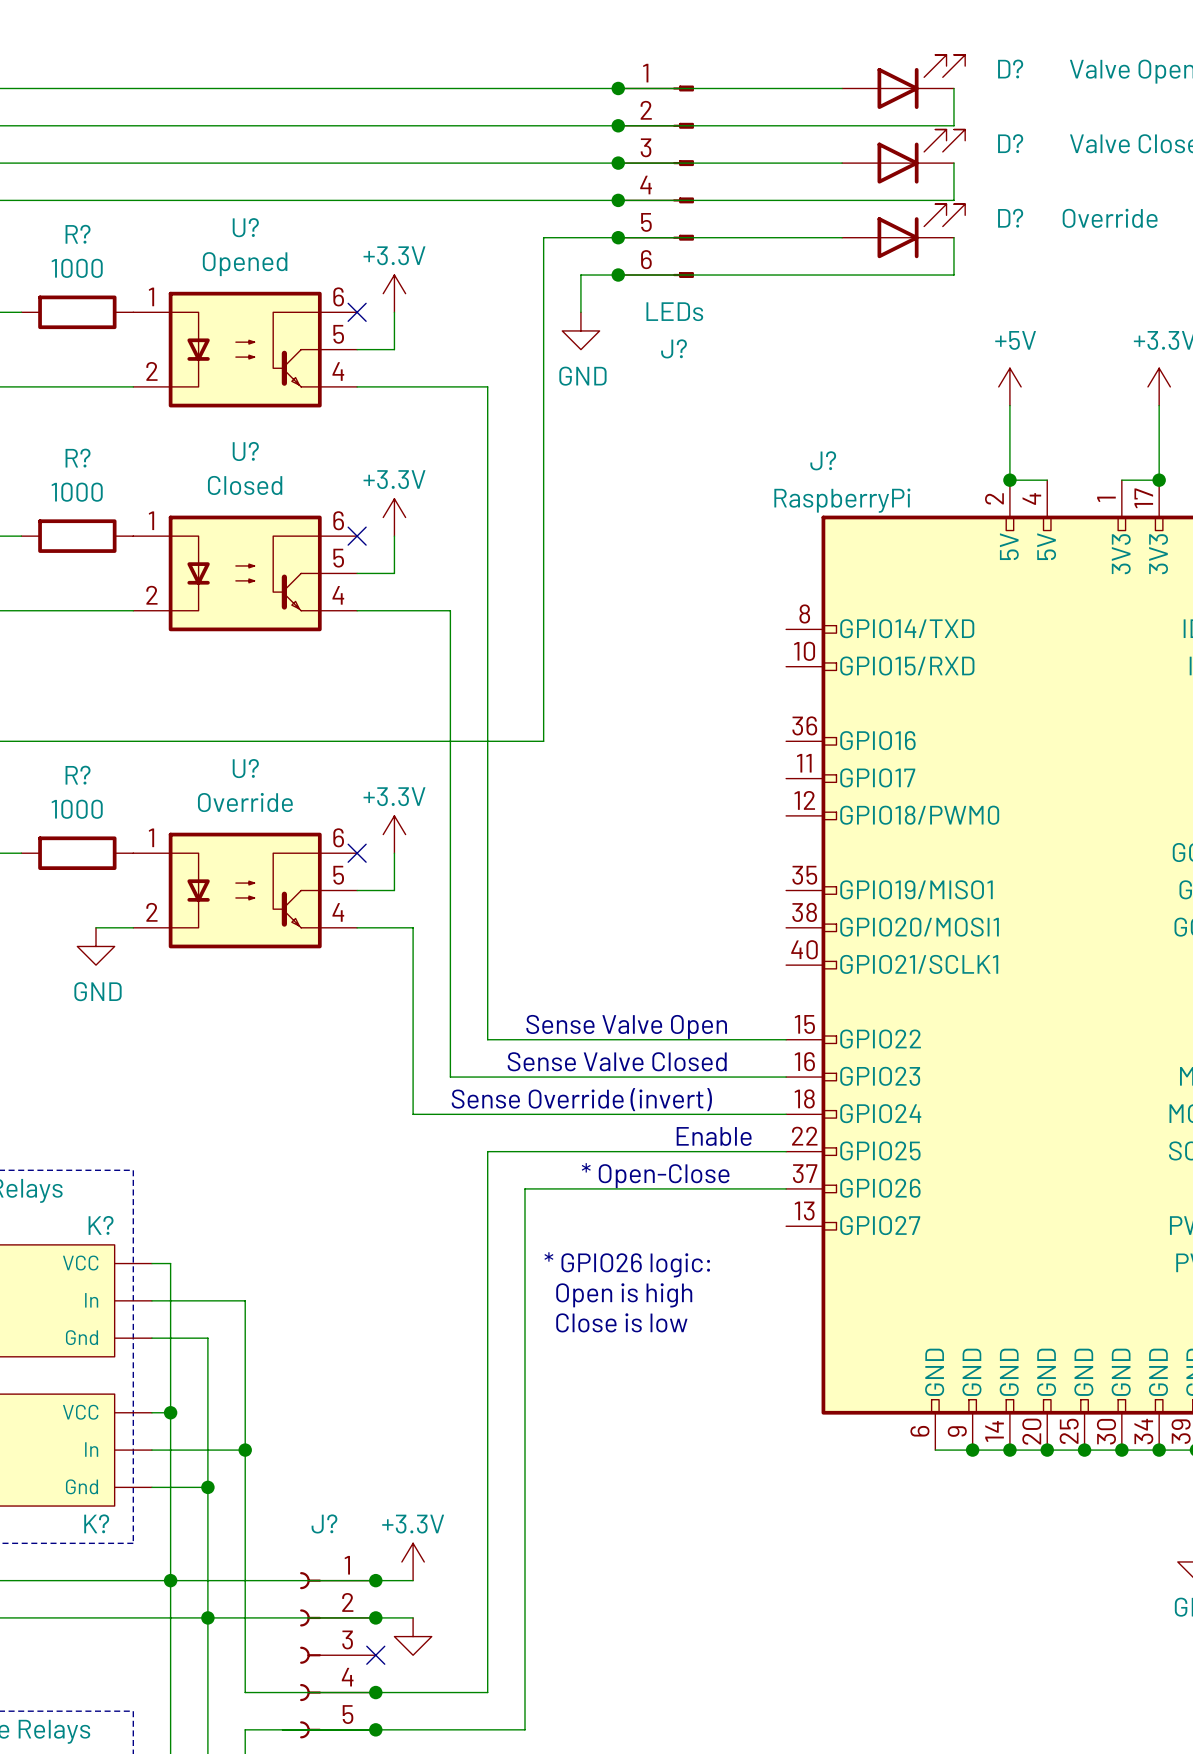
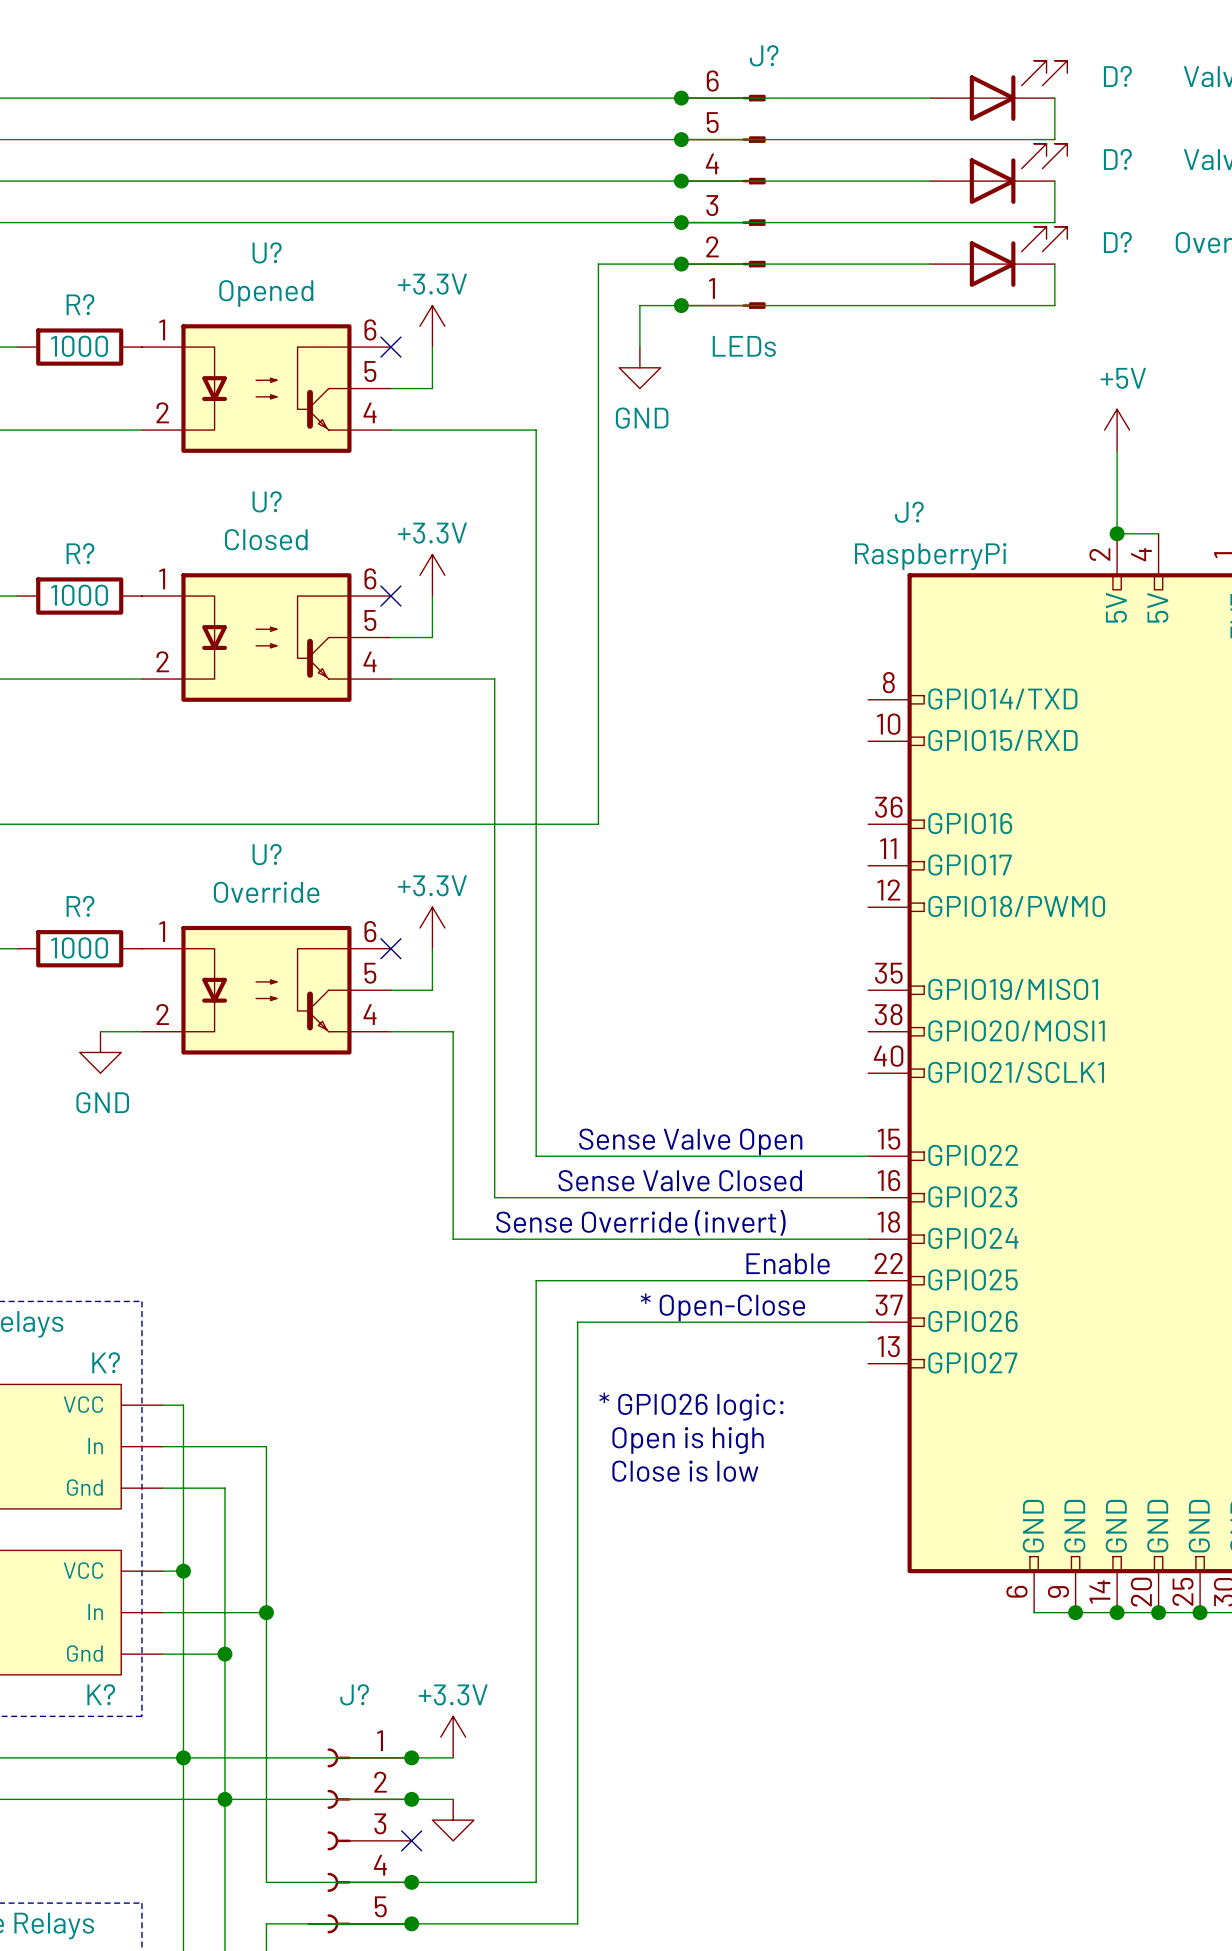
J? flip: as is (683, 181) -> up-down (754, 201)
R? name position: R? (78, 234) -> R? (80, 304)
R? value position: 1000 (77, 268) -> 1000 (79, 346)
J? name position: J? (674, 348) -> J? (764, 55)
R? name position: R? (78, 458) -> R? (80, 553)
R? value position: 1000 (77, 492) -> 1000 (79, 595)
R? name position: R? (78, 775) -> R? (80, 906)
R? value position: 1000 (77, 809) -> 1000 (79, 947)

